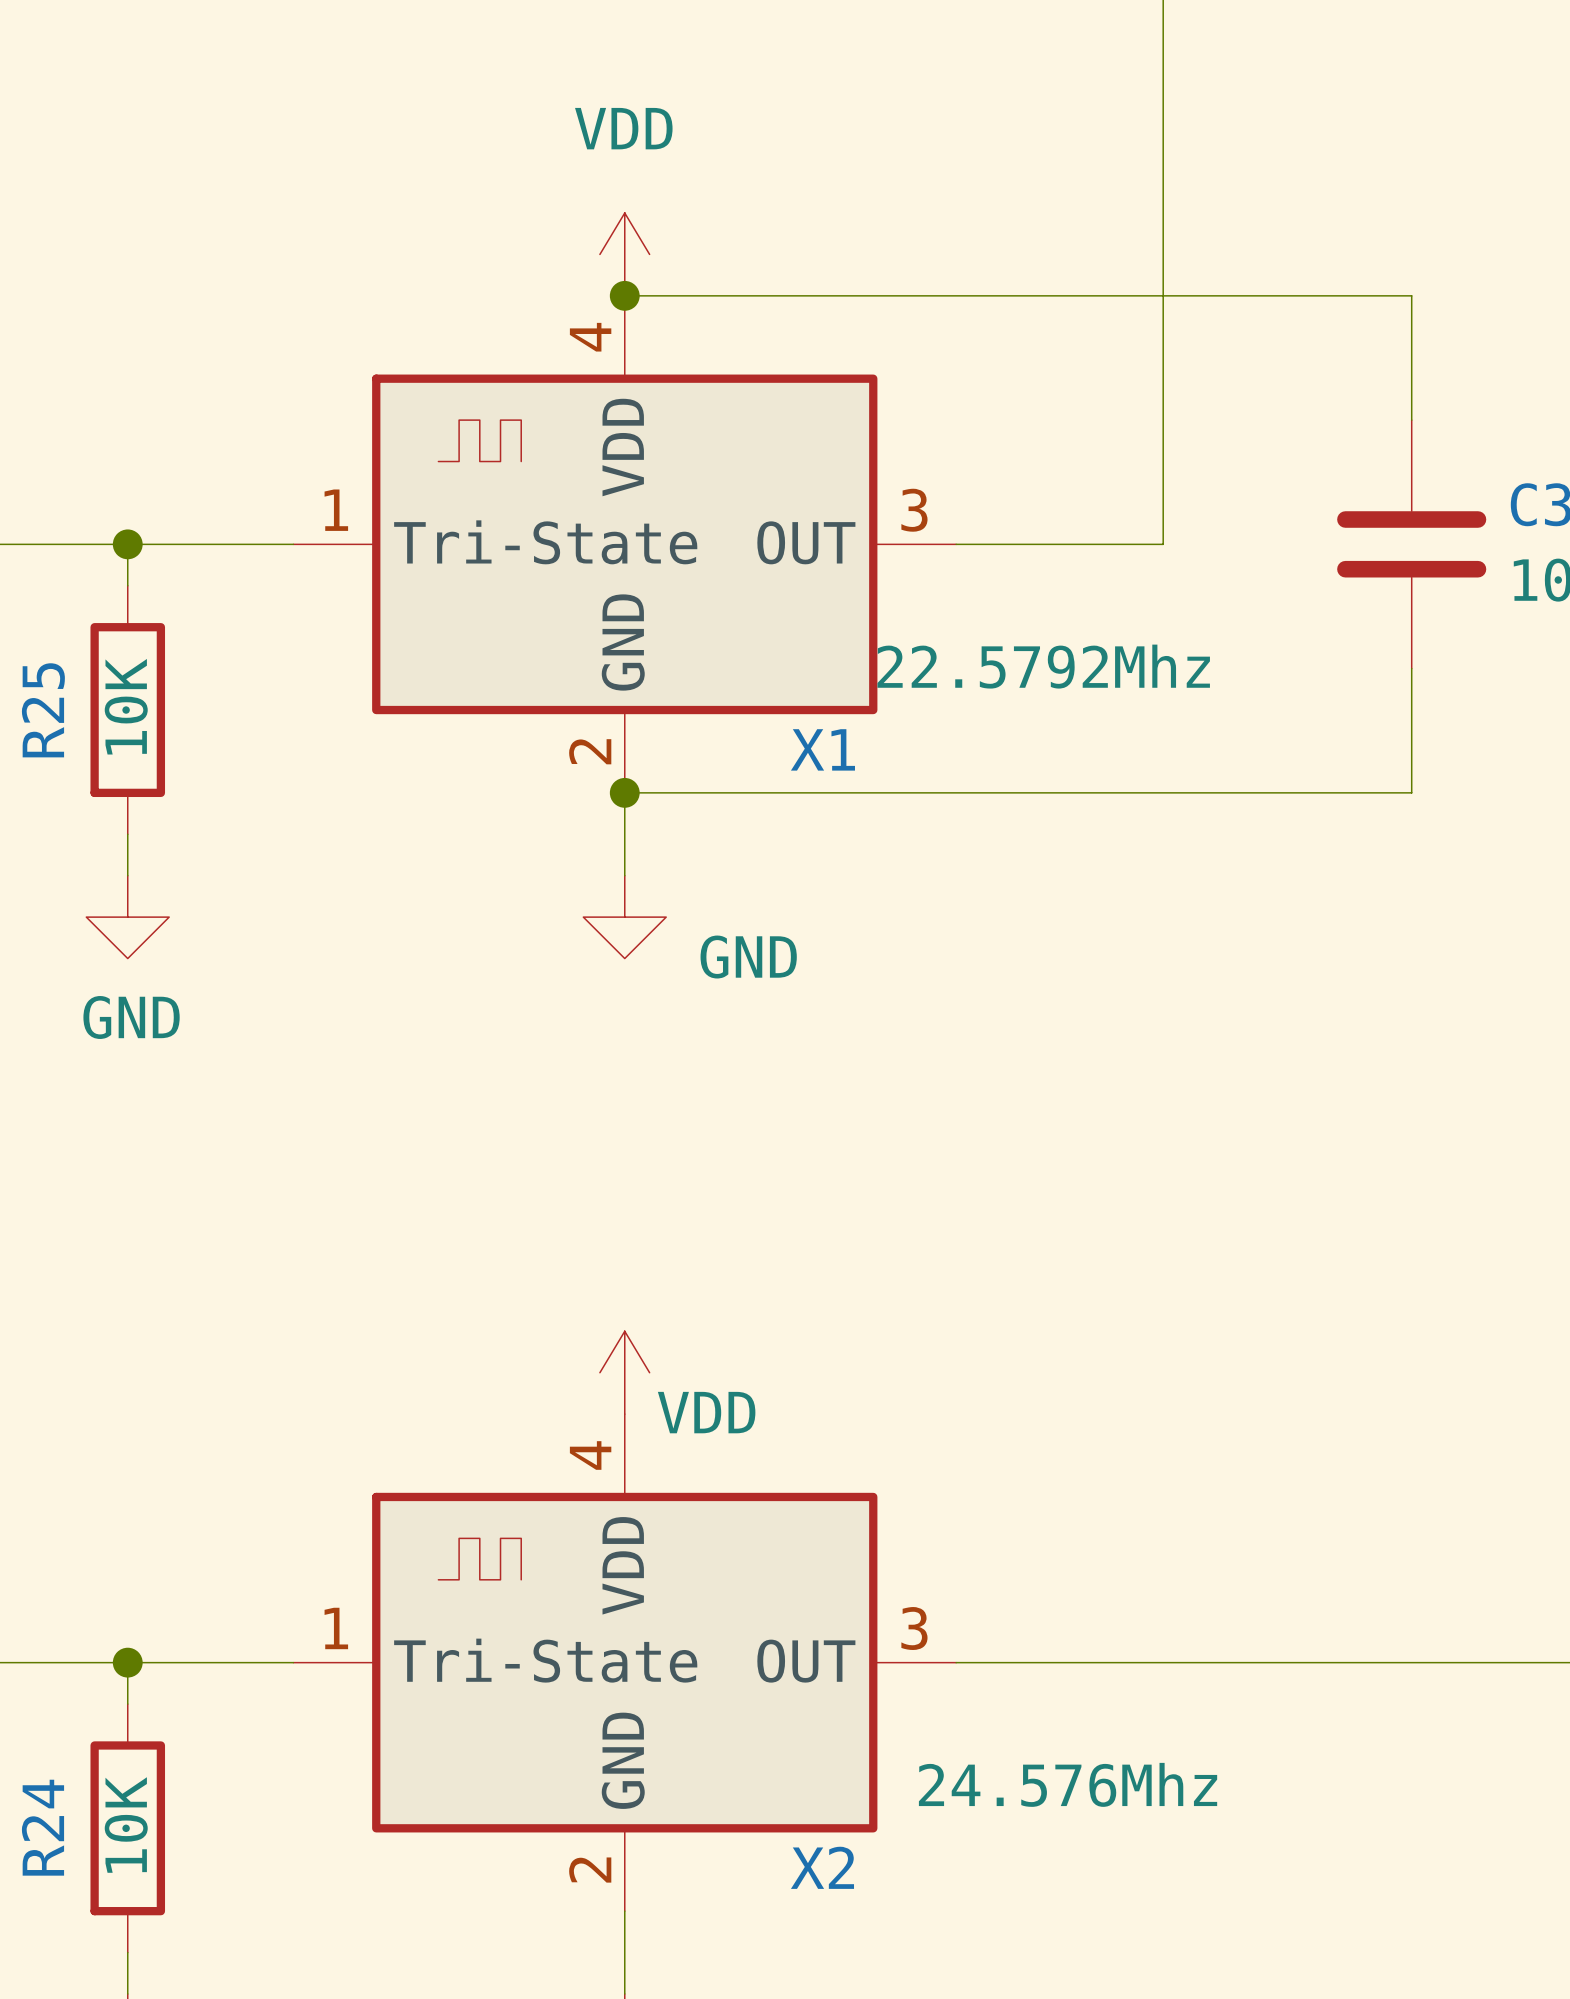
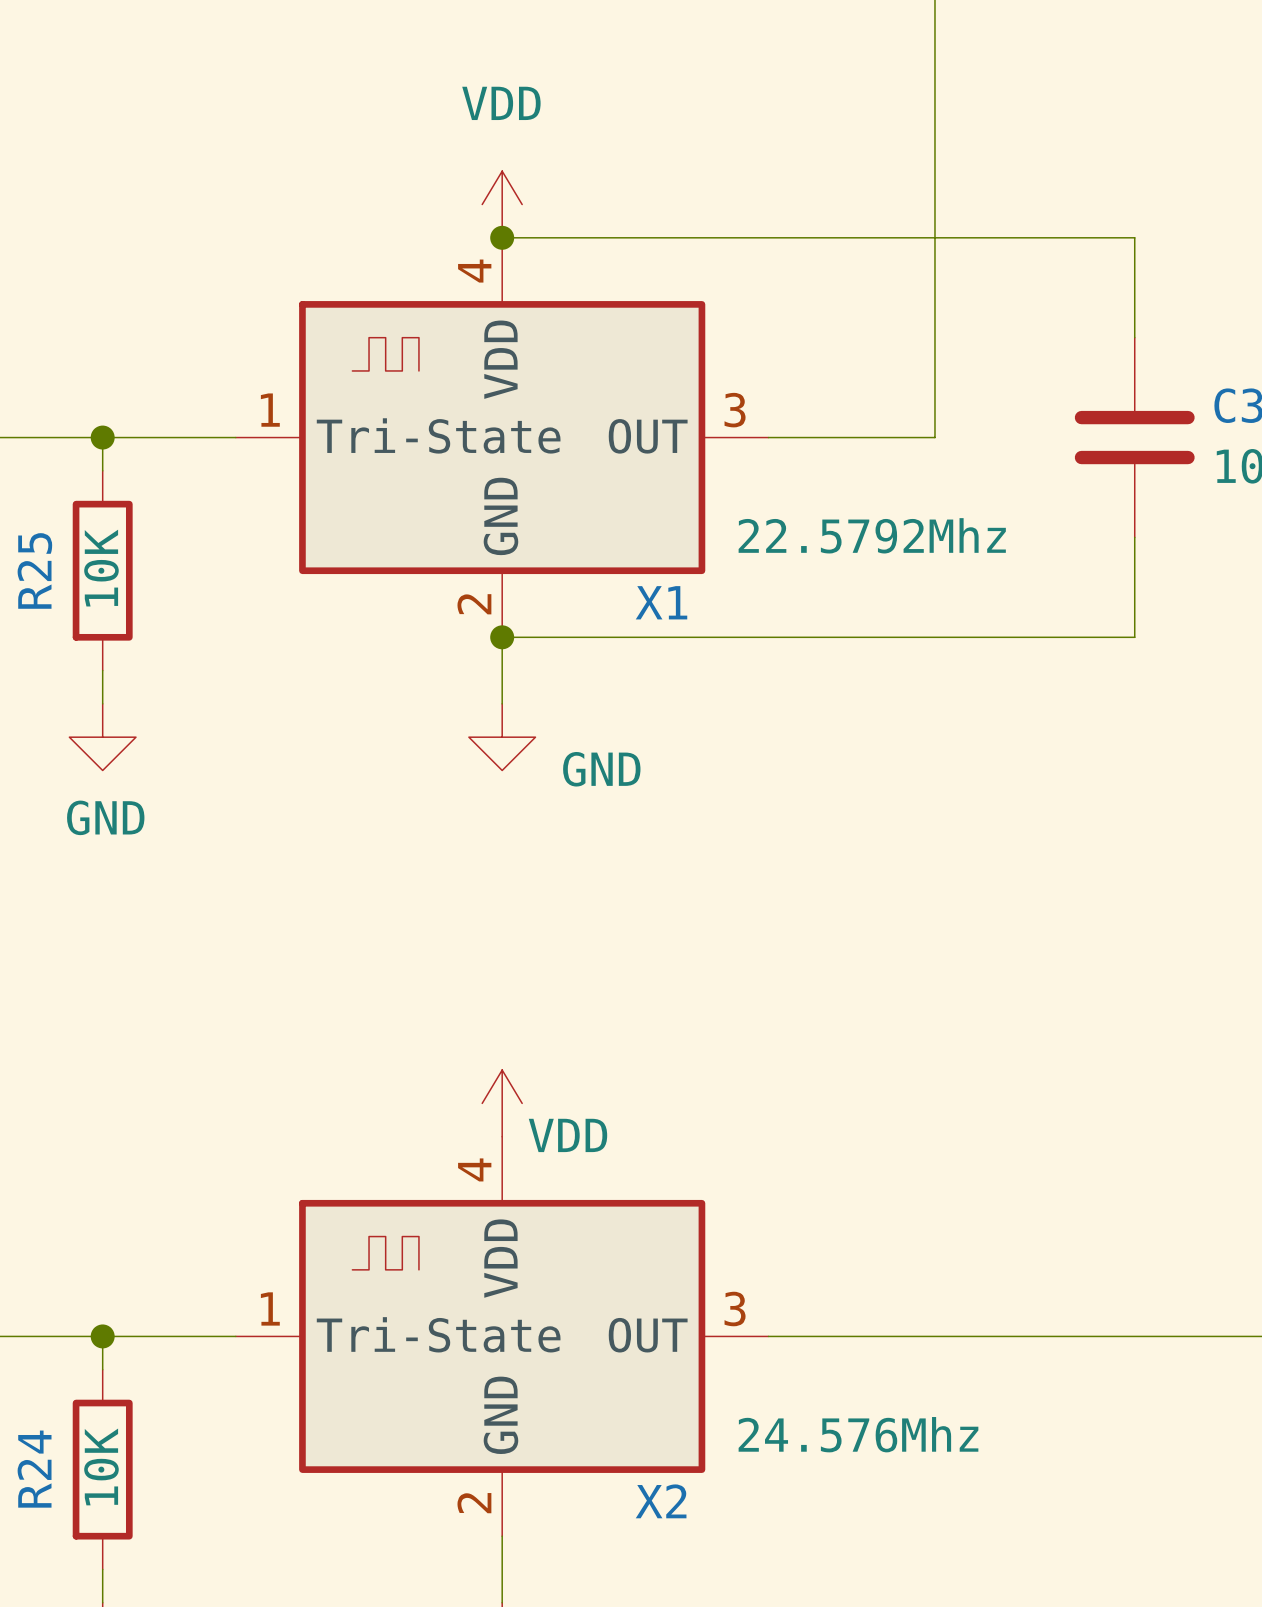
X1 value position: 22.5792Mhz (1043, 666) -> 22.5792Mhz (872, 535)

